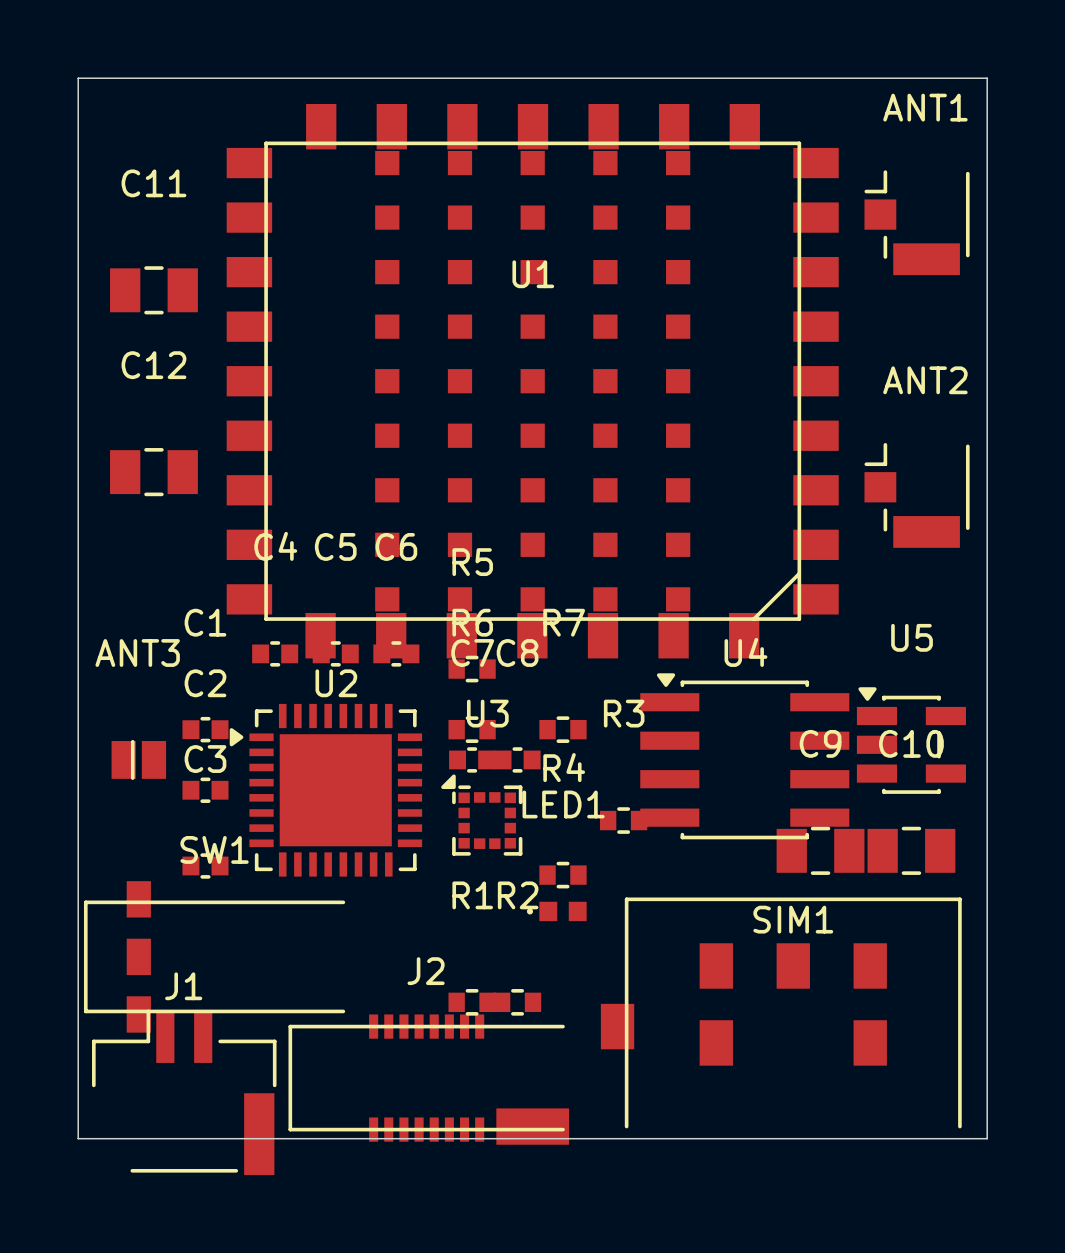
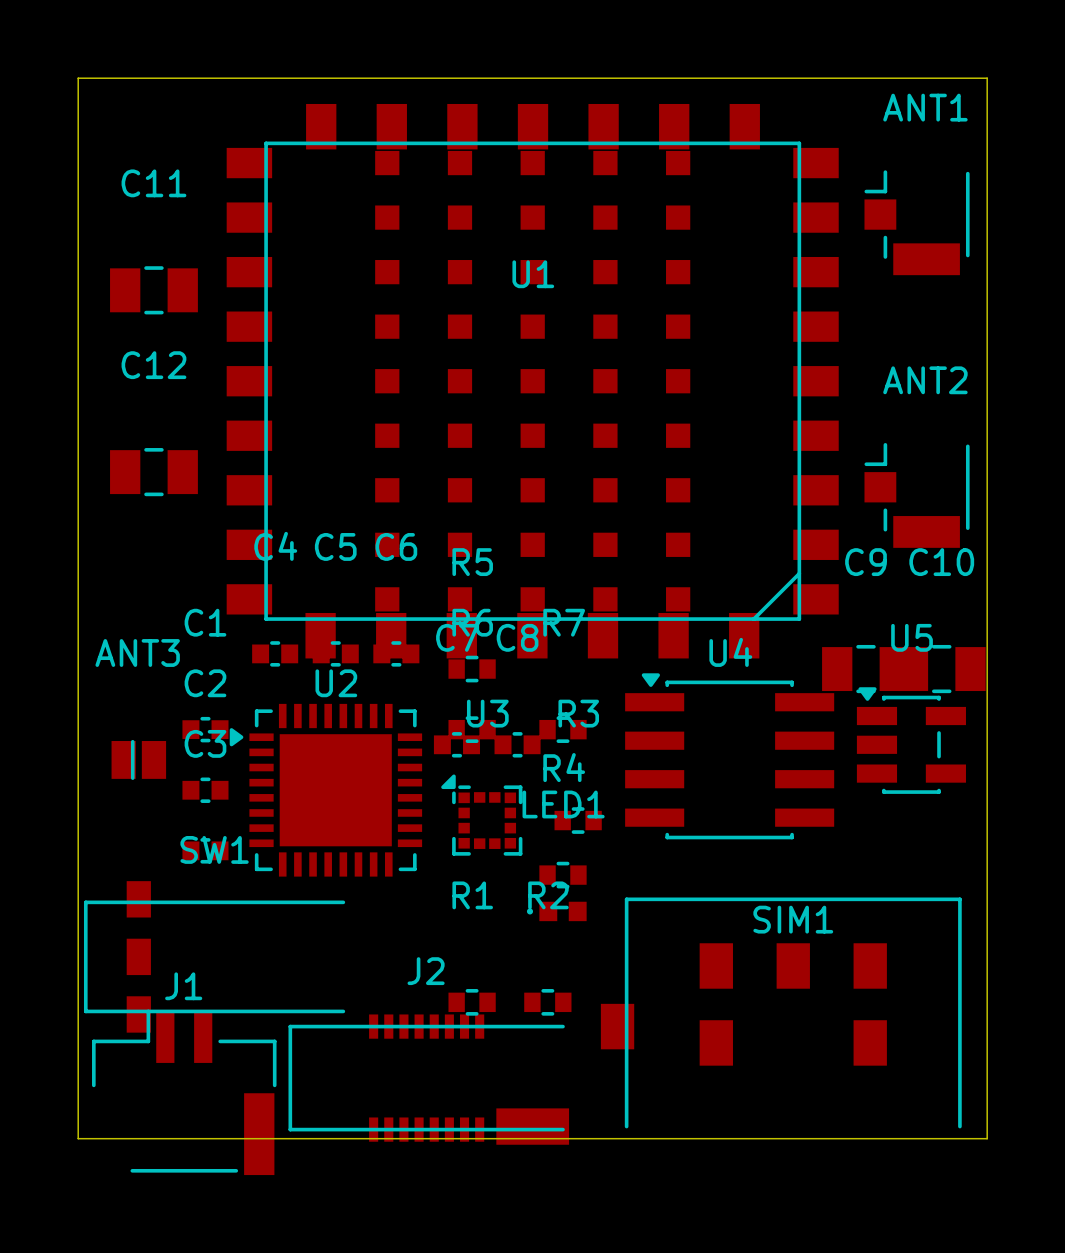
U4 position: (744, 756) -> (729, 756)
C7 position: (472, 759) -> (456, 744)
C8 position: (517, 759) -> (517, 744)
R3 position: (623, 820) -> (578, 820)
C9 position: (820, 850) -> (865, 669)
C10 position: (911, 850) -> (941, 669)
C3 position: (205, 865) -> (205, 850)
R2 position: (517, 1002) -> (547, 1002)

